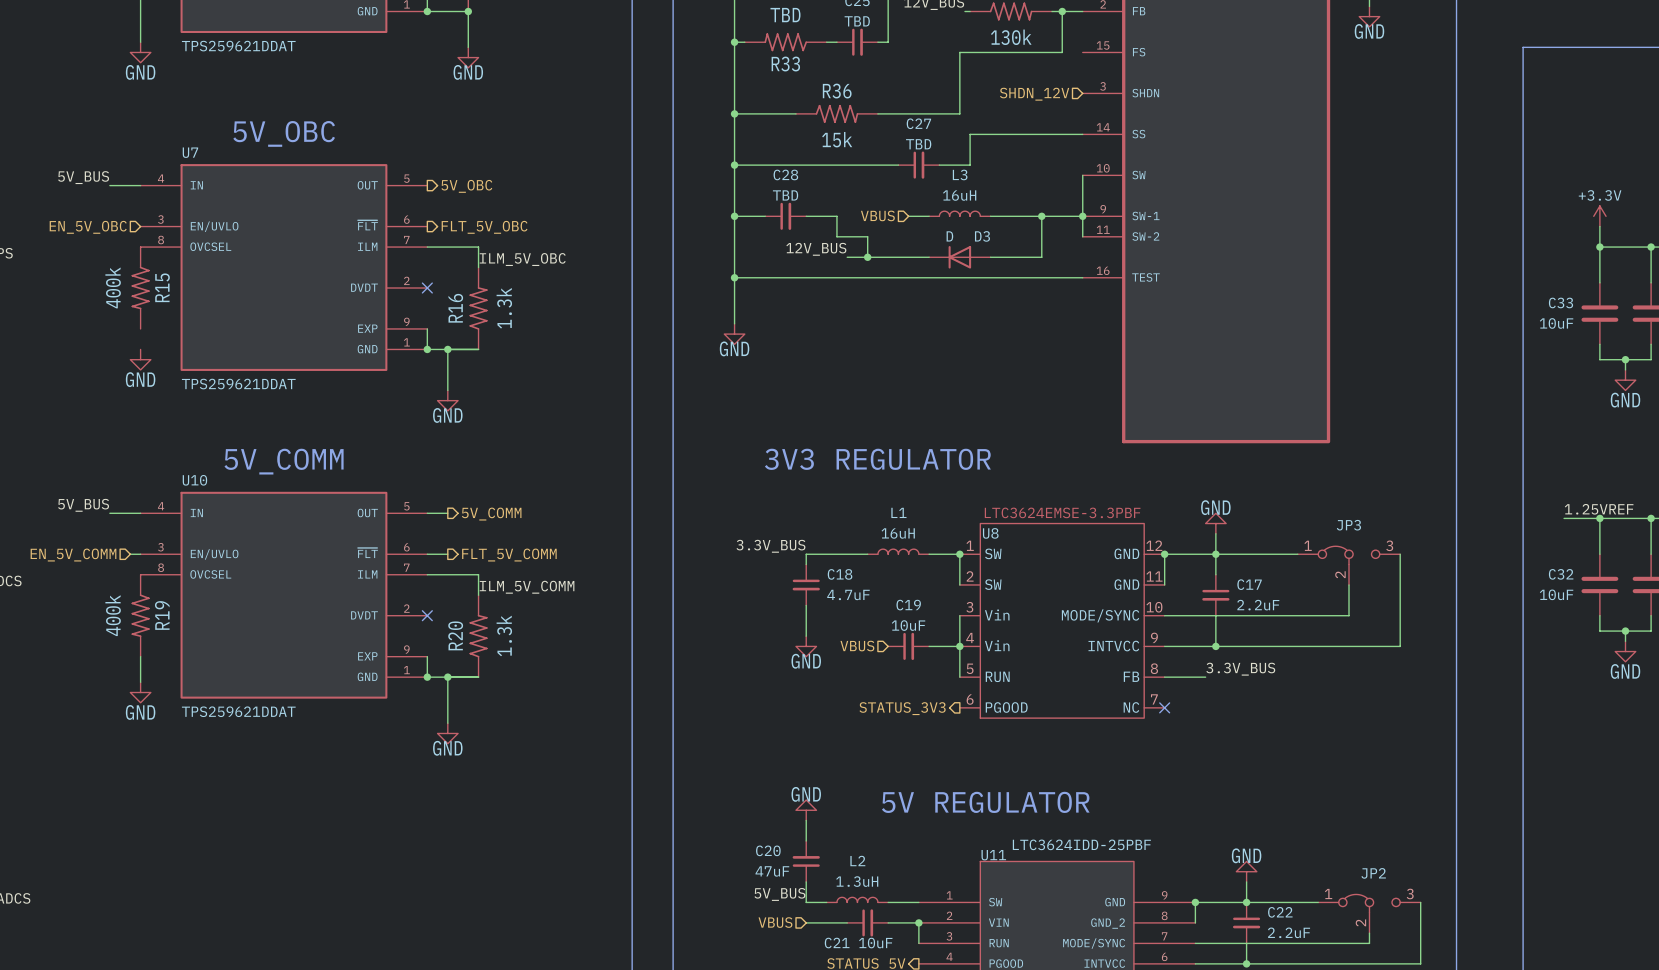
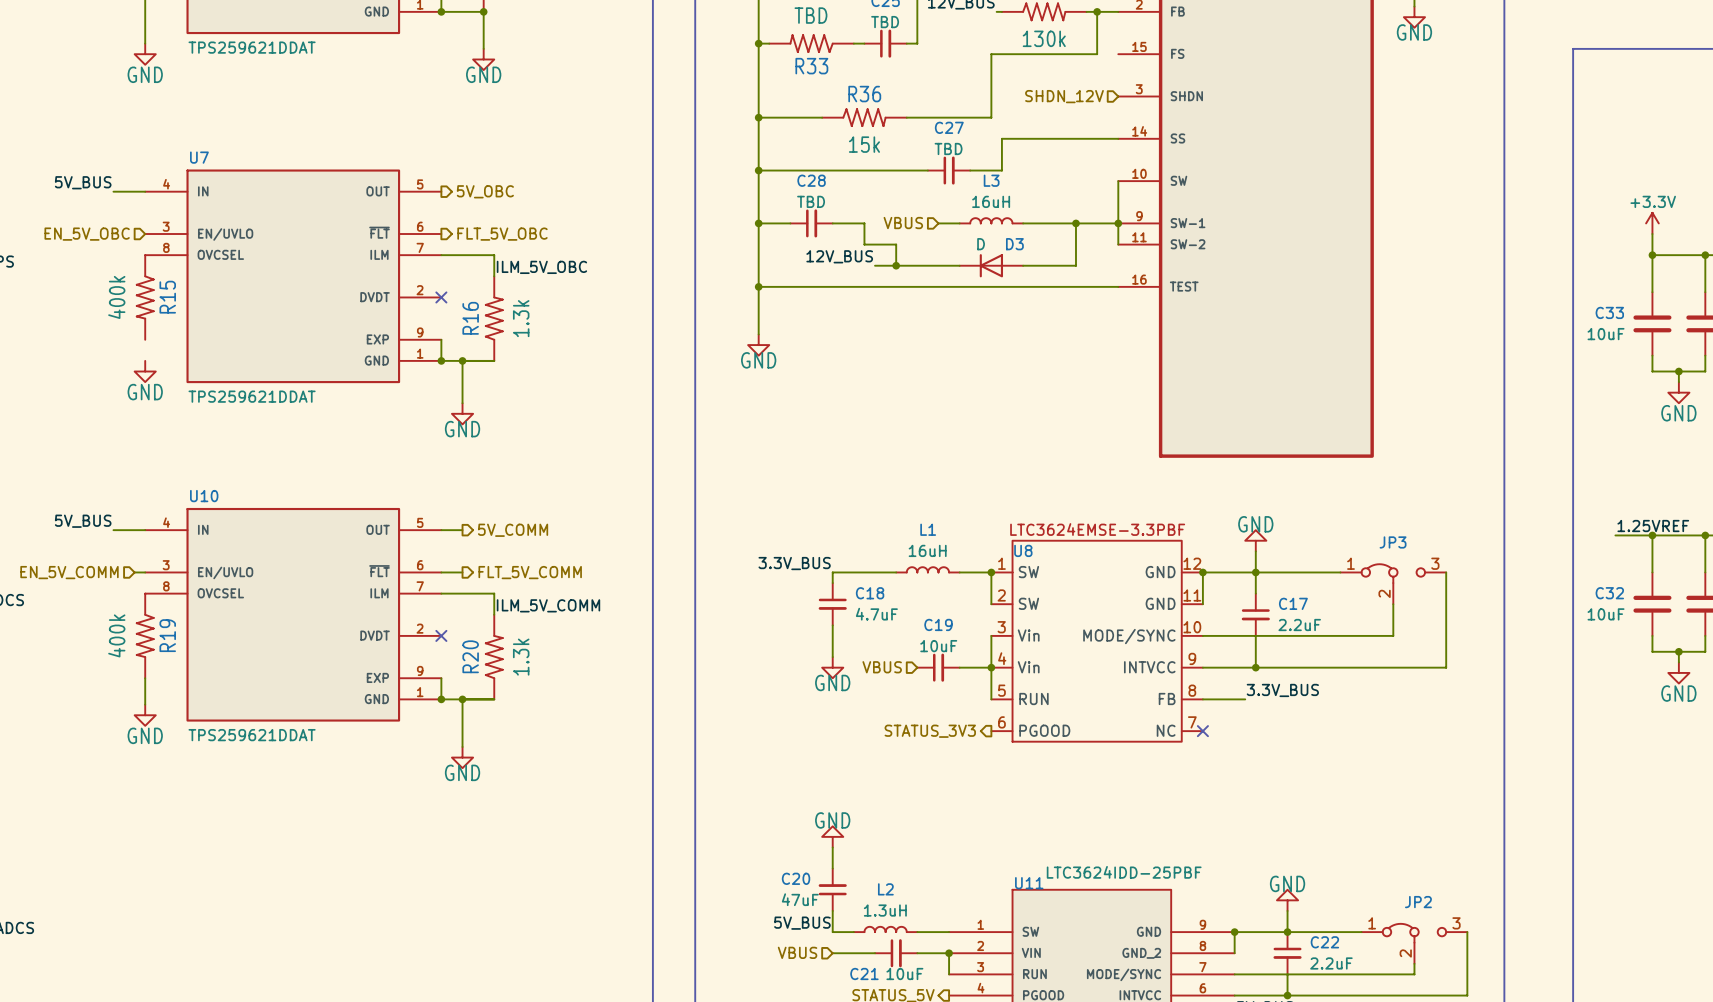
text: 5V_OBC (284, 133) -> none
text: 3V3 REGULATOR (877, 459) -> none
text: 5V_COMM (284, 461) -> none
text: 5V REGULATOR (985, 802) -> none

